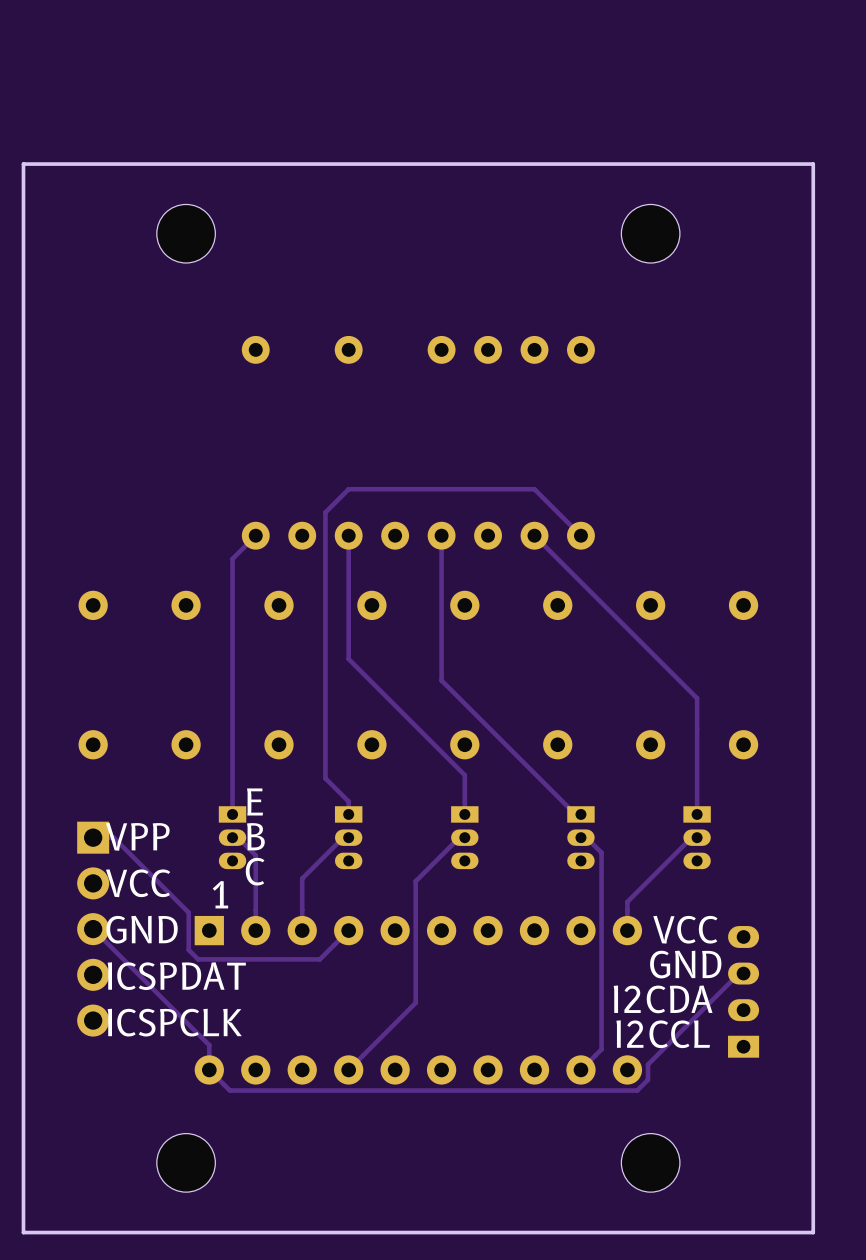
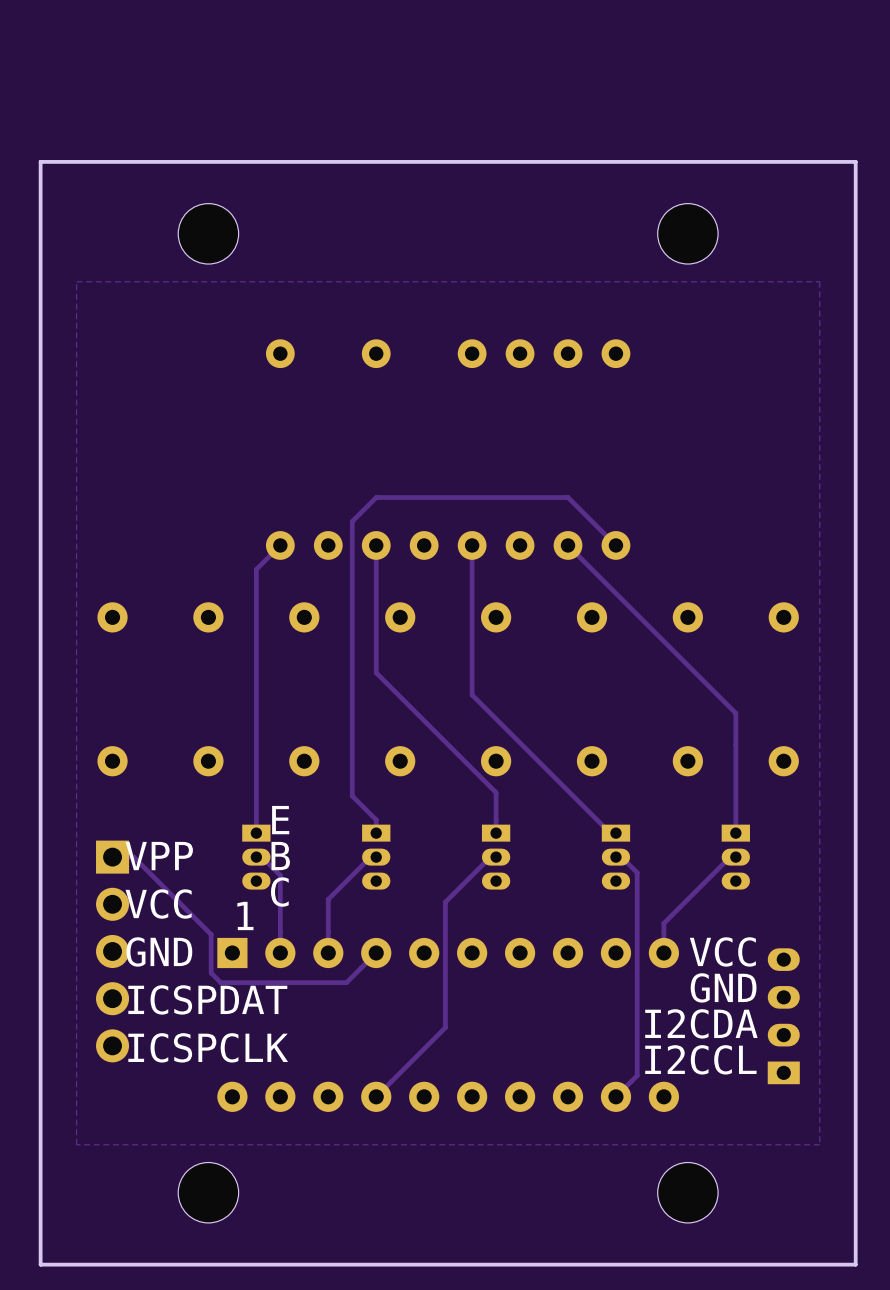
zone outline: none -> (819, 281) (76, 281) (76, 1144) (819, 1144) (819, 281)
track: (93, 929) (209, 1045) (209, 1069) (229, 1090) (637, 1090) (648, 1079) (648, 1064) (738, 973) -> none

